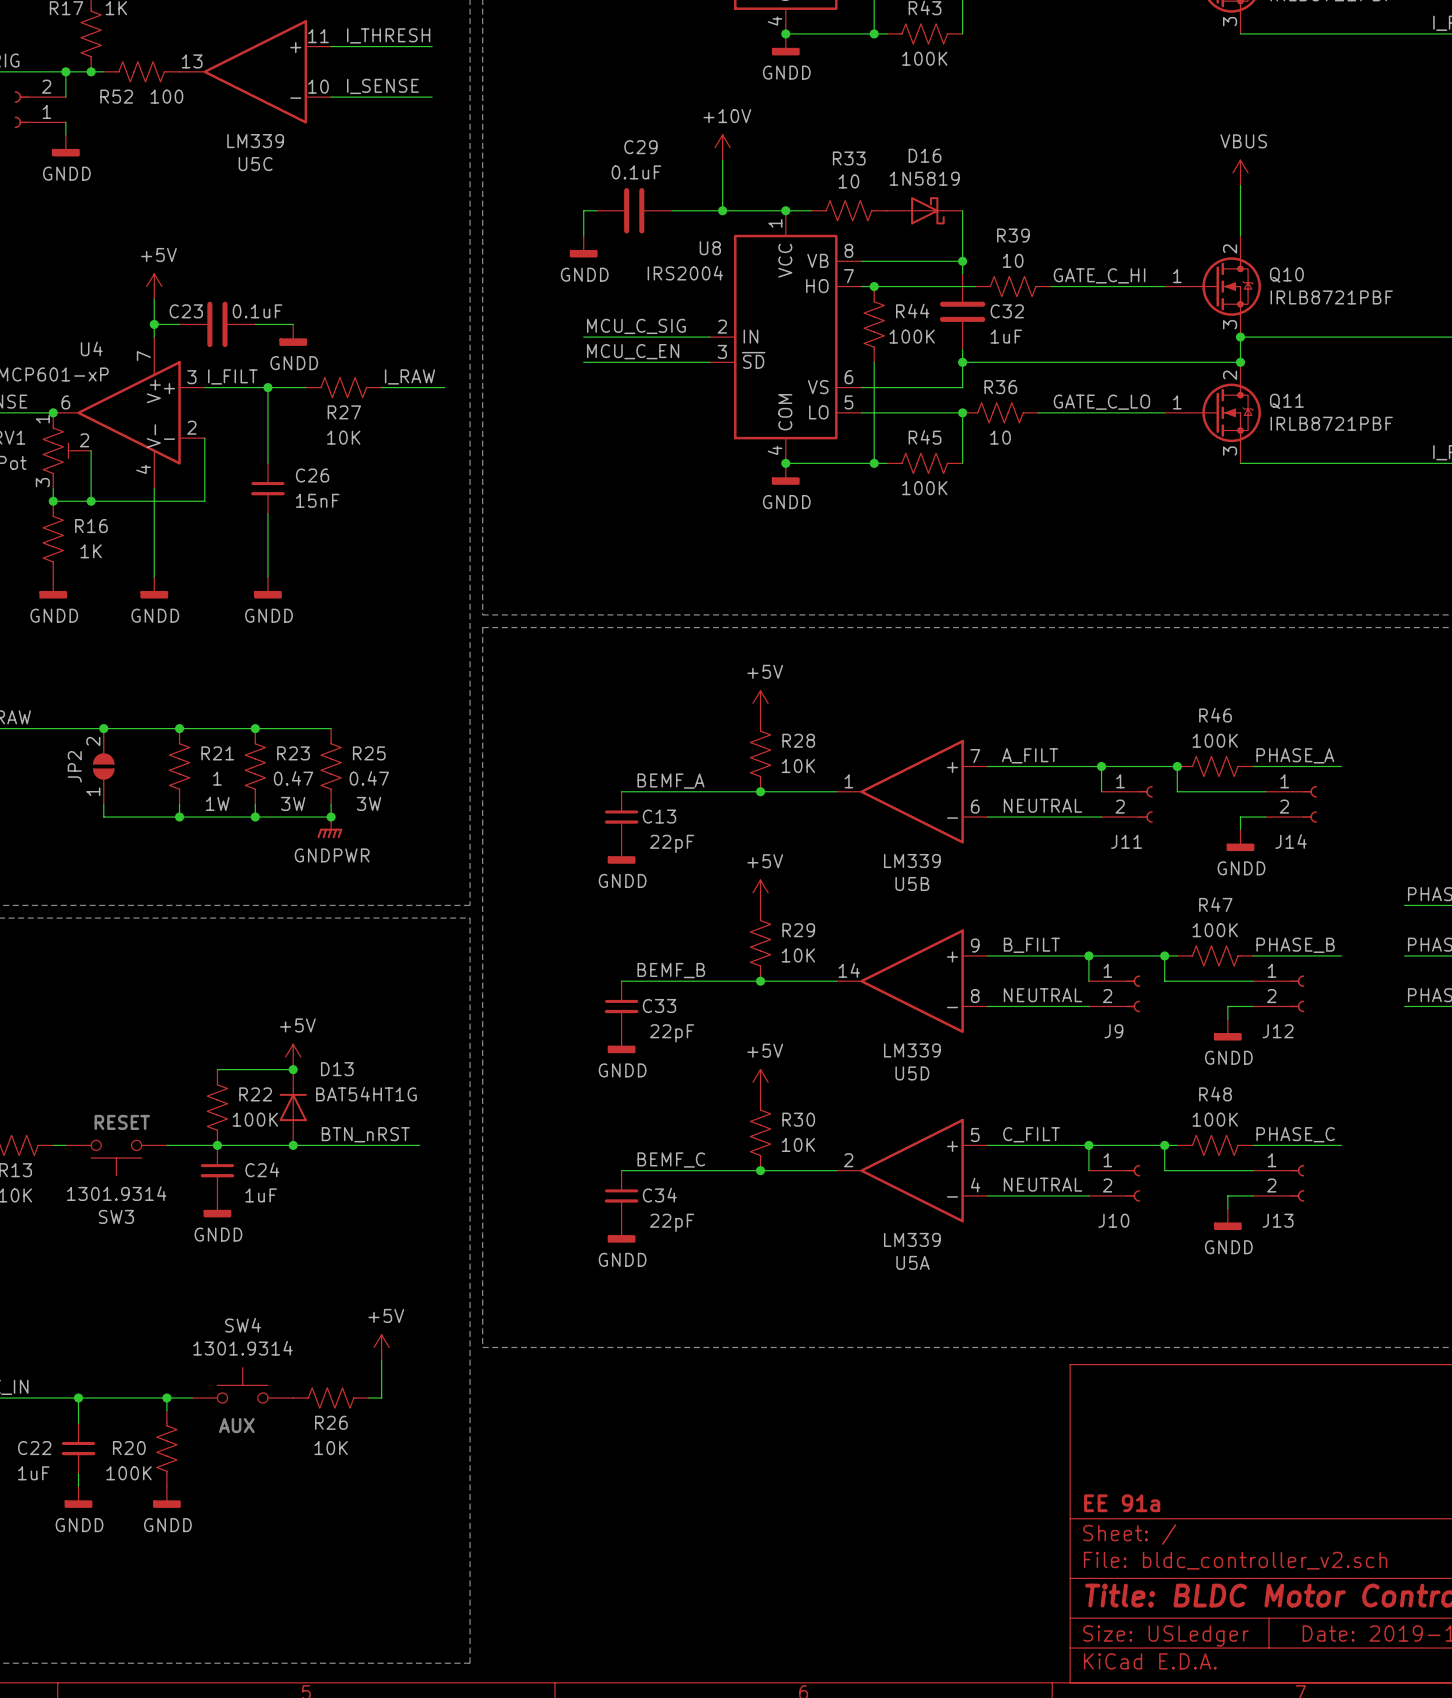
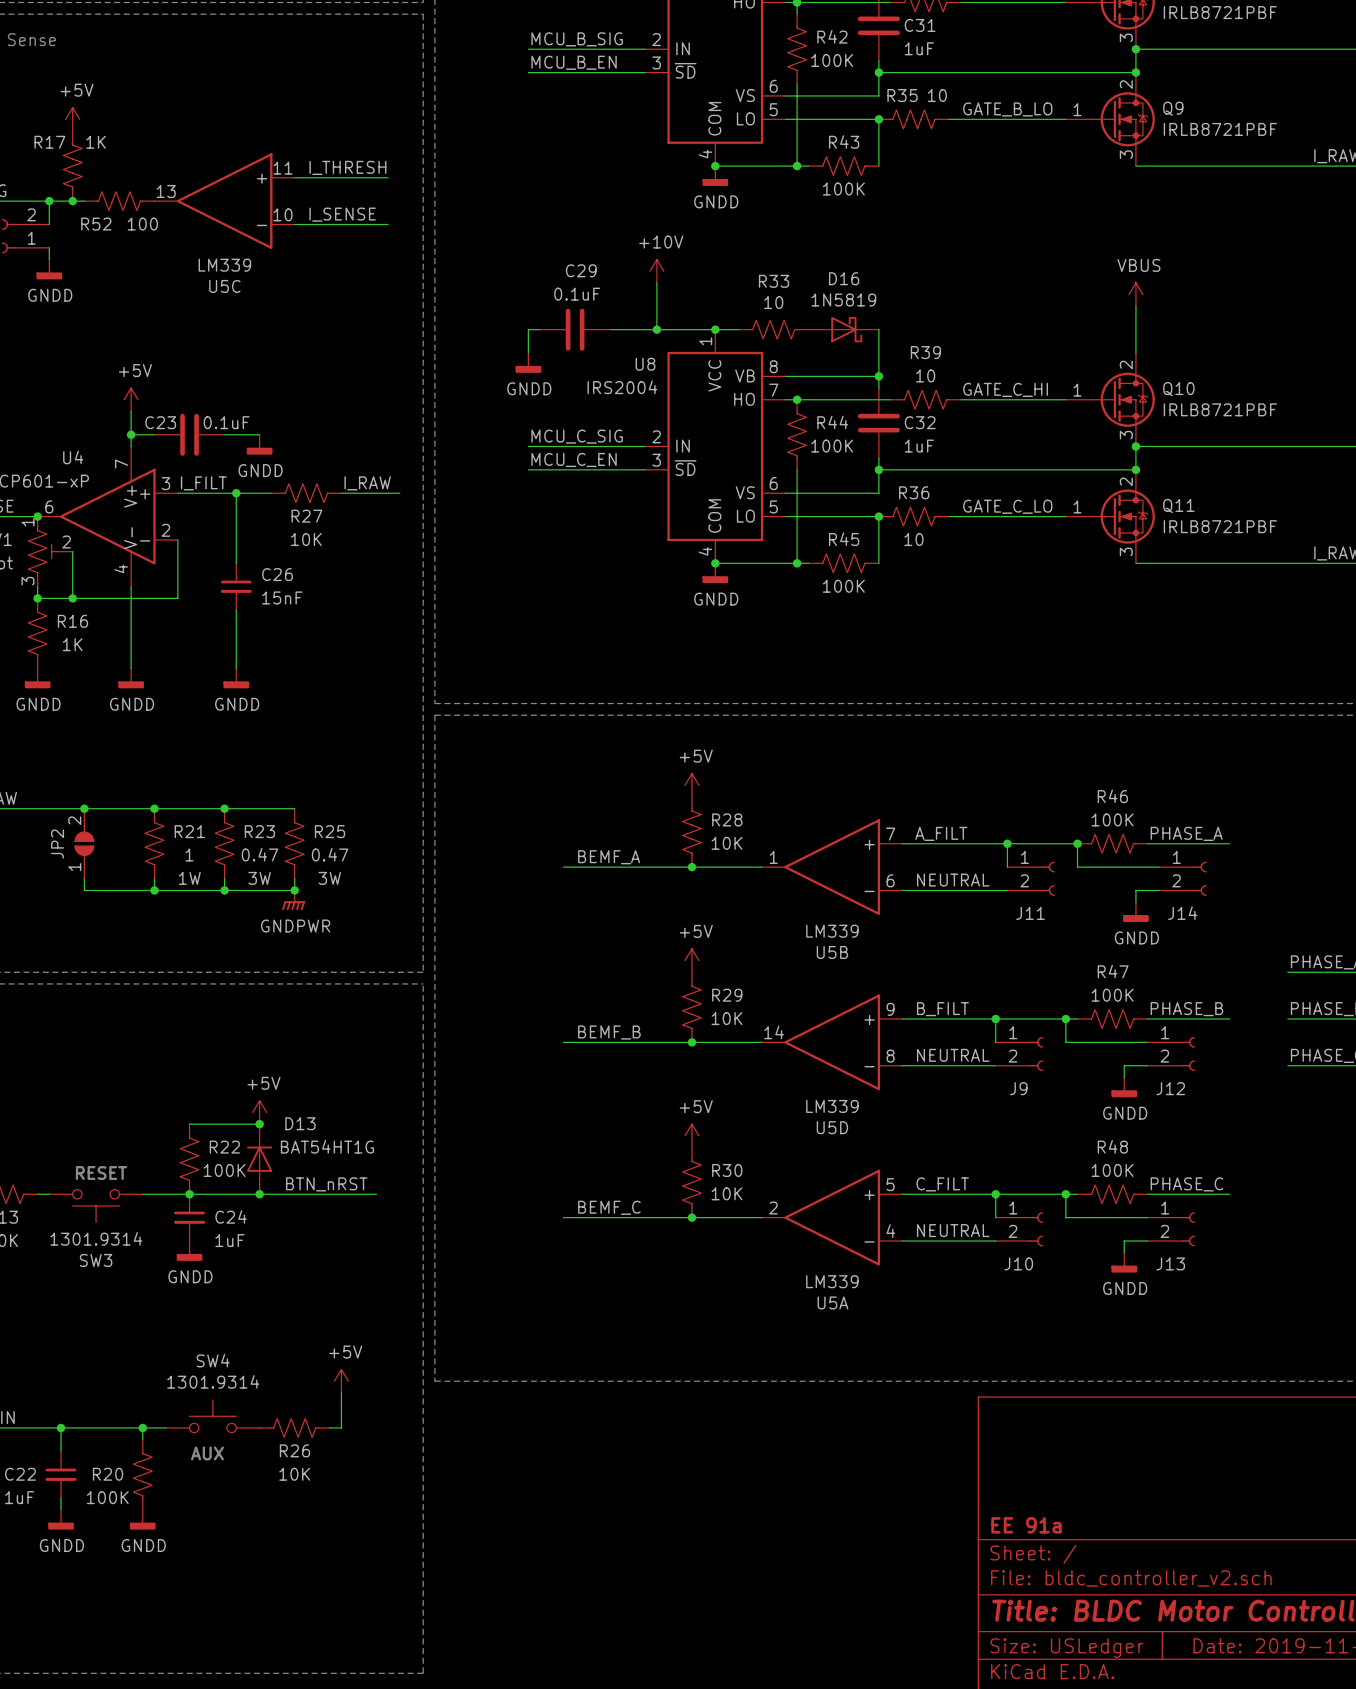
C13: 22pF (621, 817) -> none
power symbol: GNDD (621, 853) -> none
C33: 22pF (621, 1006) -> none
power symbol: GNDD (621, 1042) -> none
C34: 22pF (621, 1195) -> none
power symbol: GNDD (621, 1231) -> none

